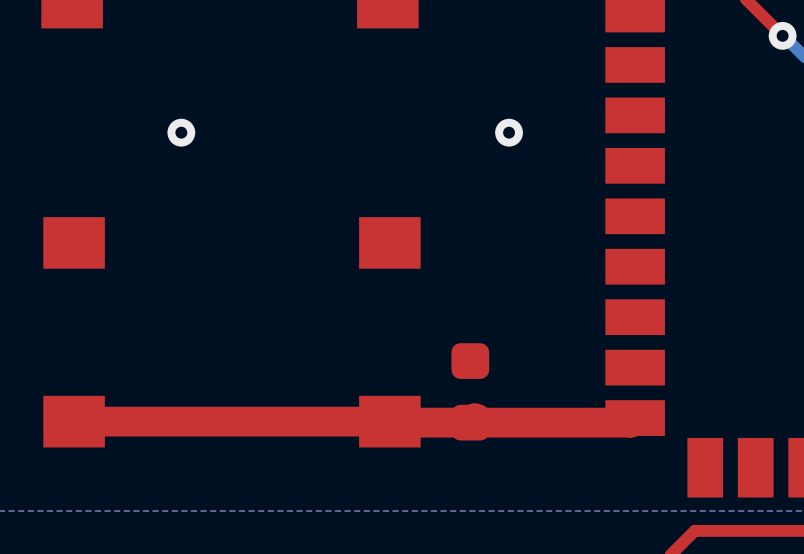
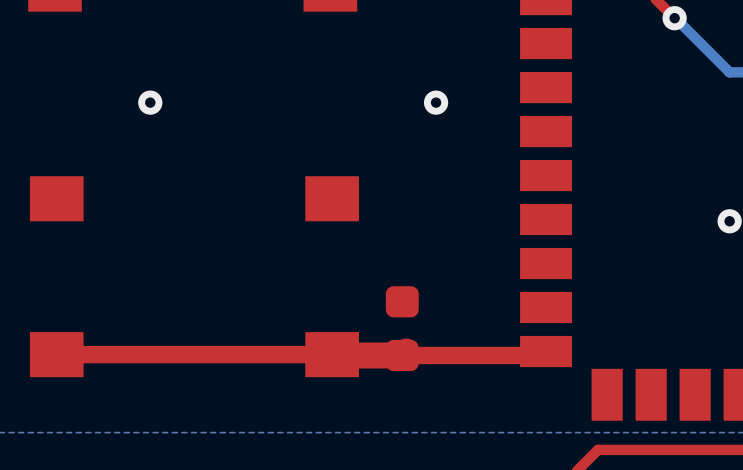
top track width: thick (635, 418) (630, 422) (470, 422) -> thin (546, 351) (542, 355) (402, 355)
top track width: thick (389, 421) (74, 421) -> thin (332, 354) (56, 354)

